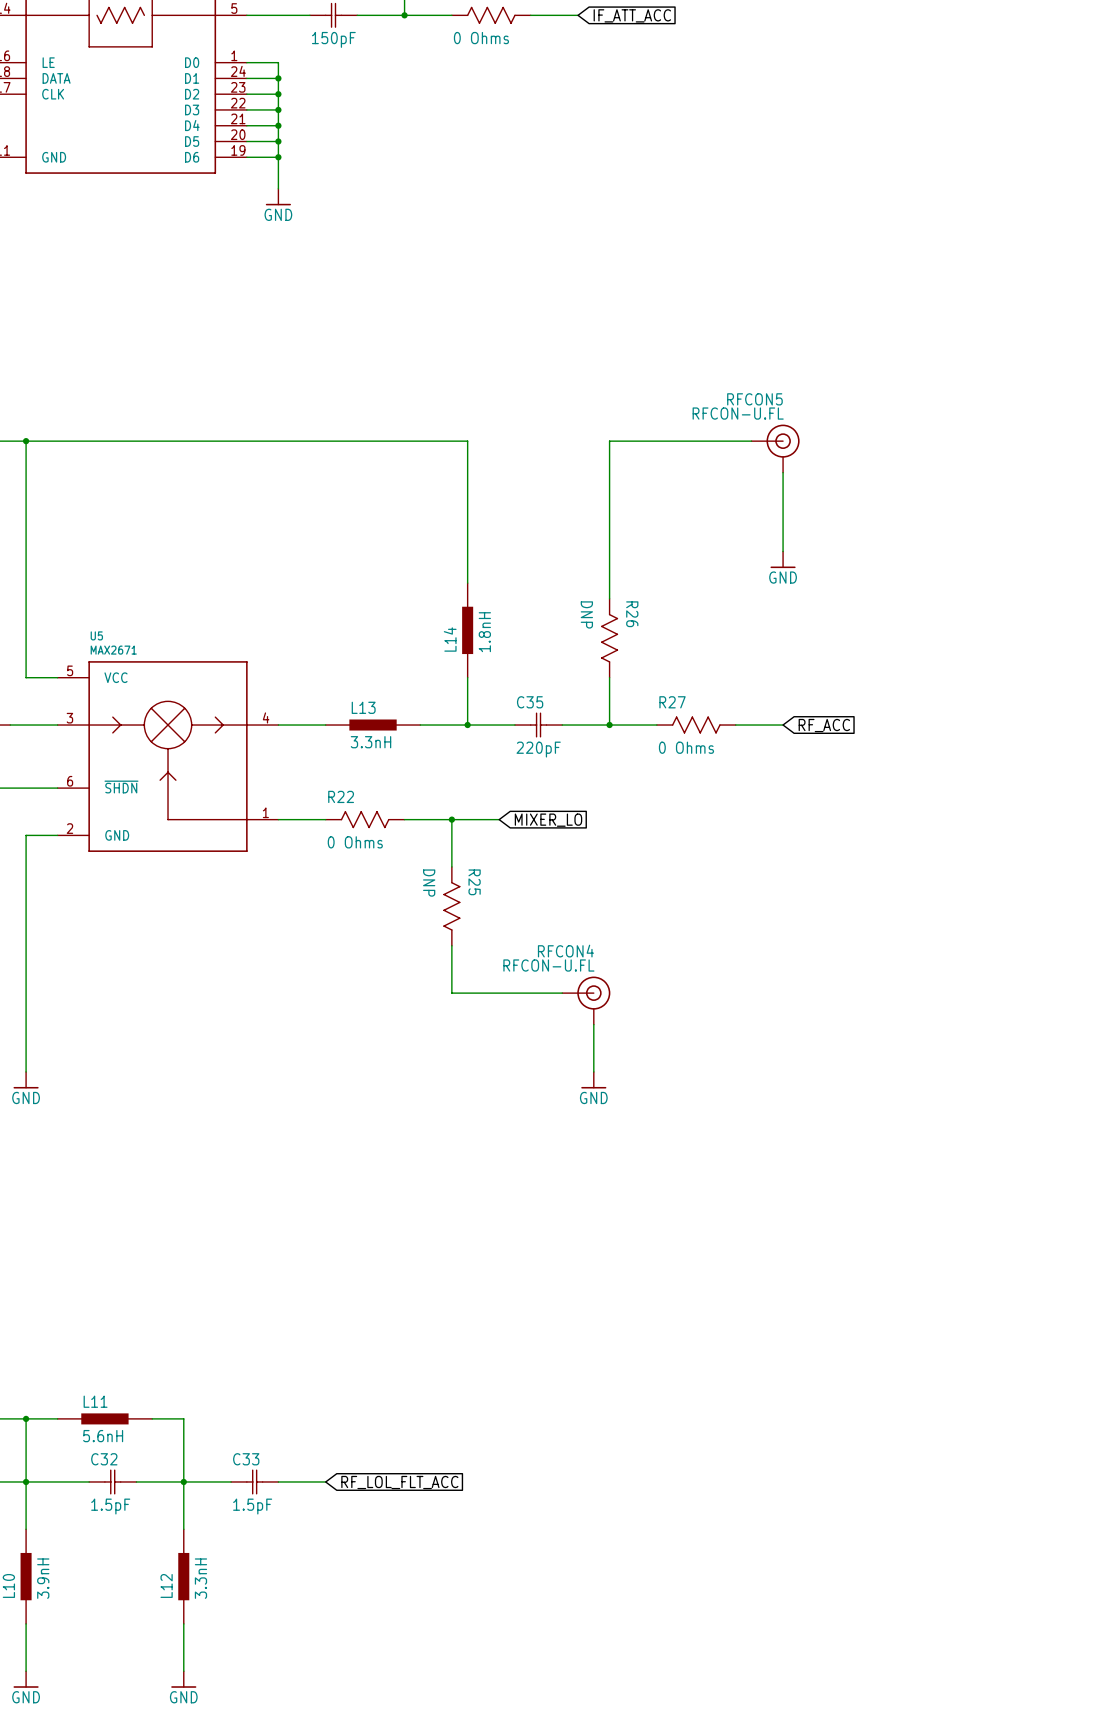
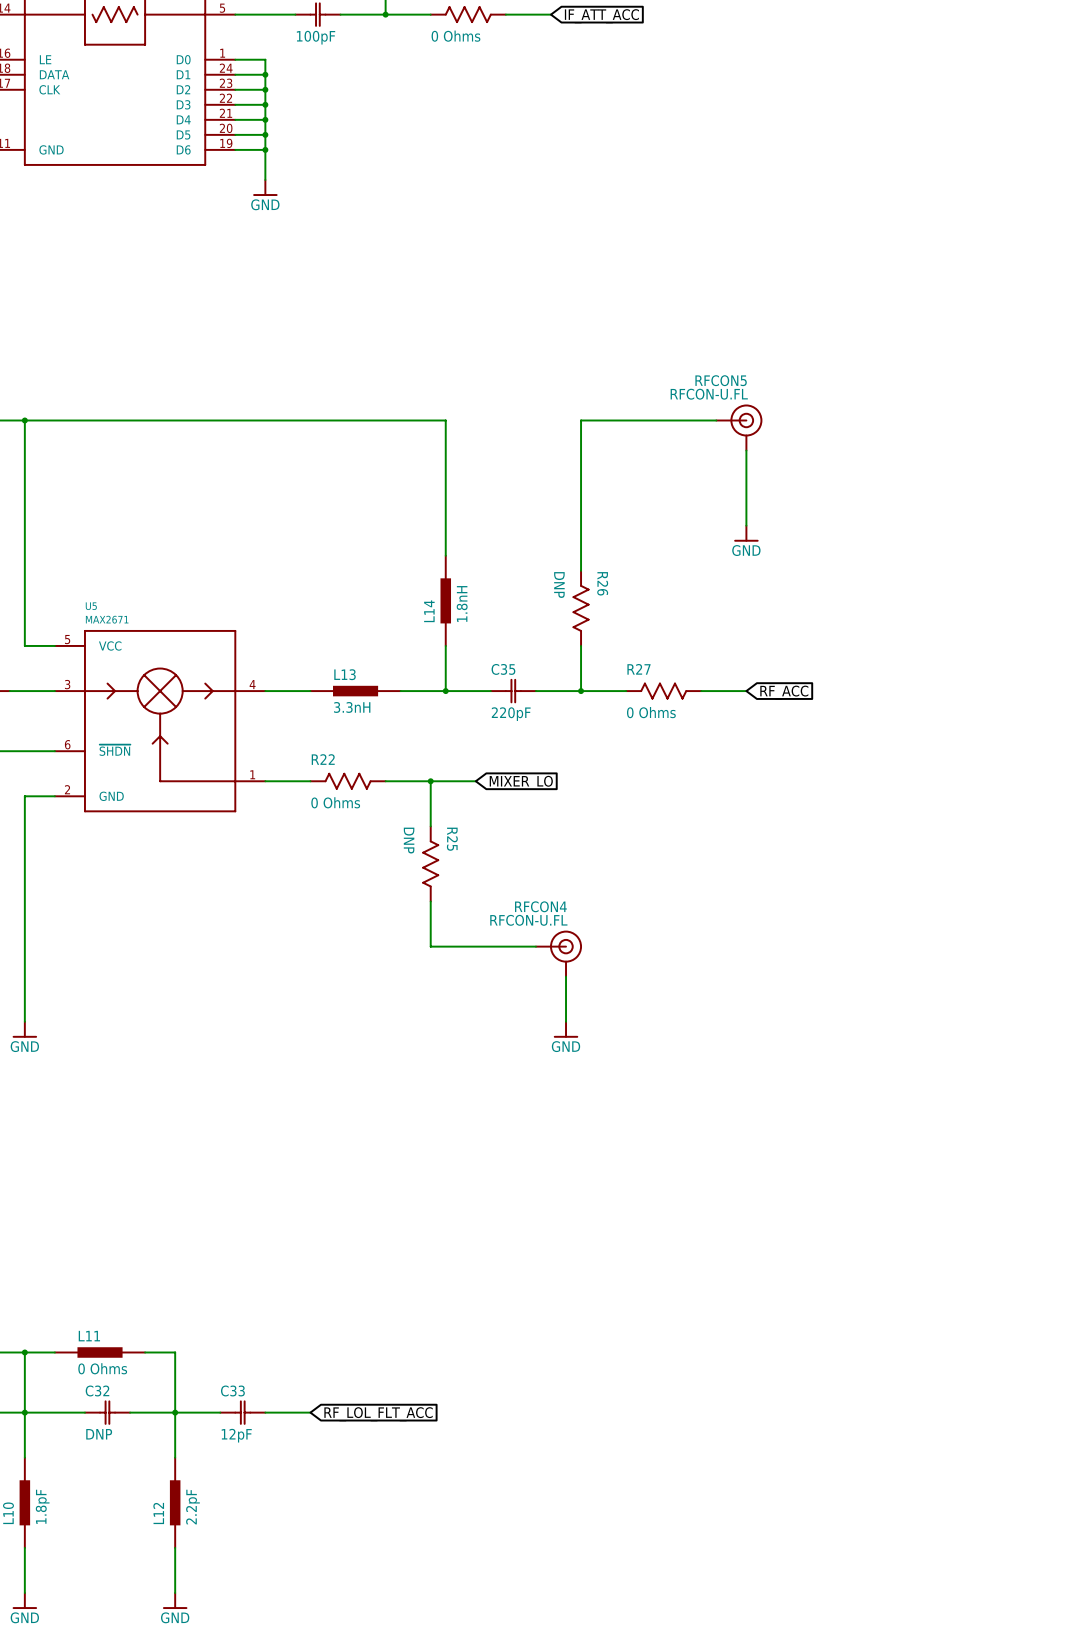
part value: 150pF (333, 39) -> 100pF (316, 37)
L11 value: 5.6nH (103, 1436) -> 0 Ohms (102, 1368)
C32 value: 1.5pF (110, 1506) -> DNP (99, 1434)
C33 value: 1.5pF (252, 1506) -> 12pF (236, 1435)
L10 value: 3.9nH (43, 1578) -> 1.8pF (42, 1506)
L12 value: 3.3nH (200, 1578) -> 2.2pF (192, 1507)

